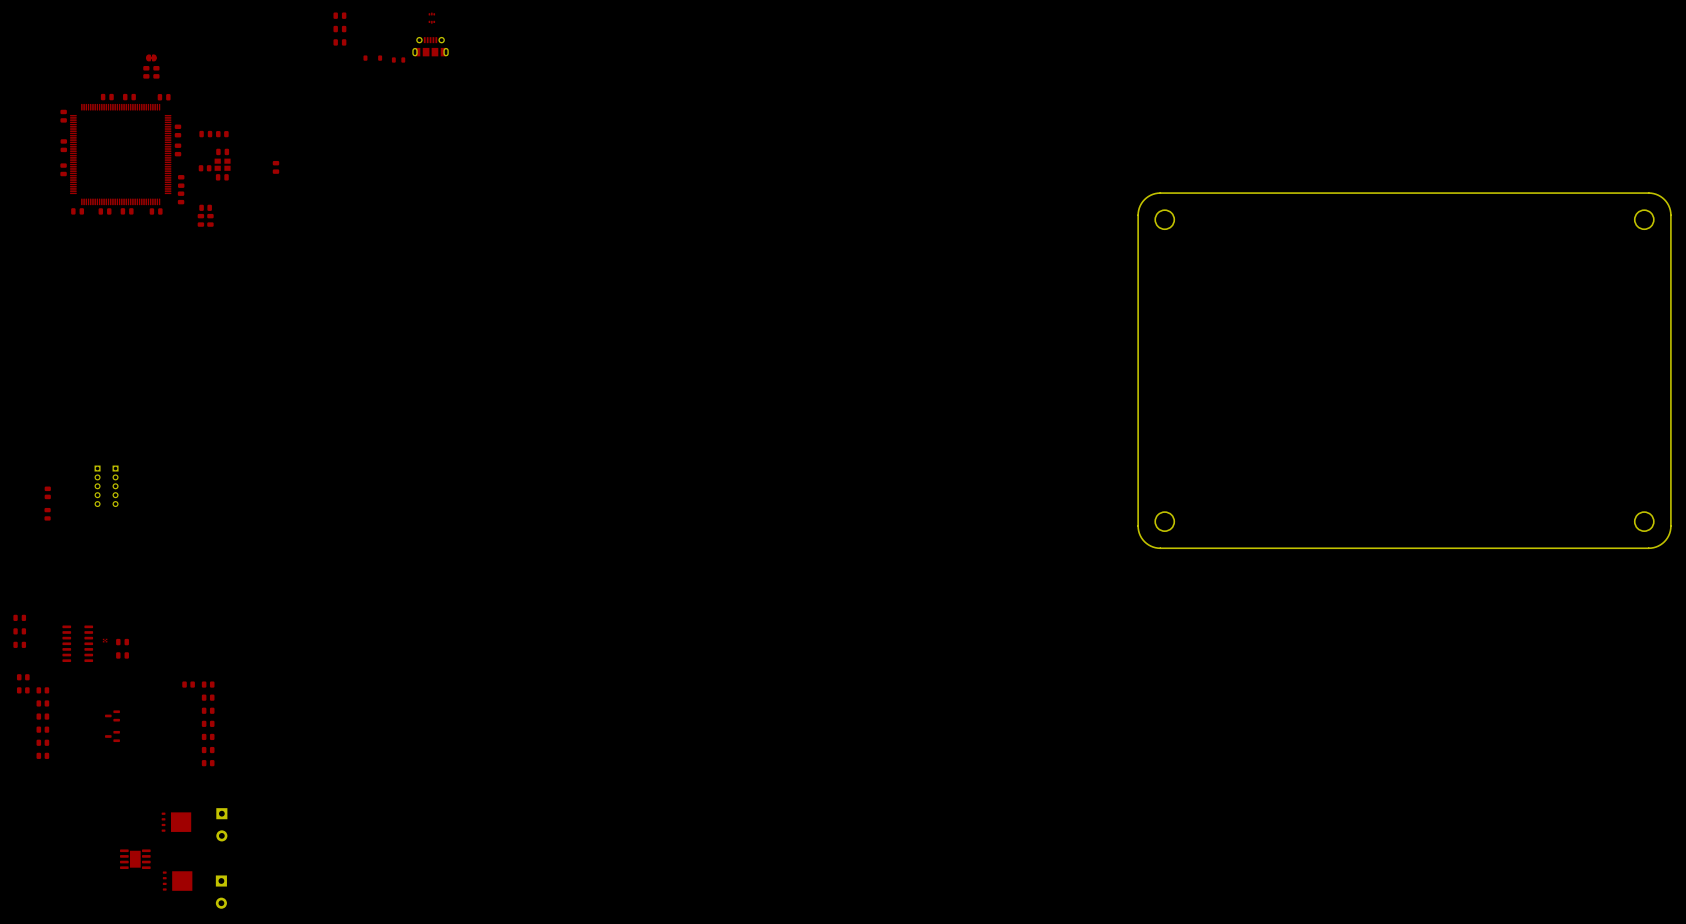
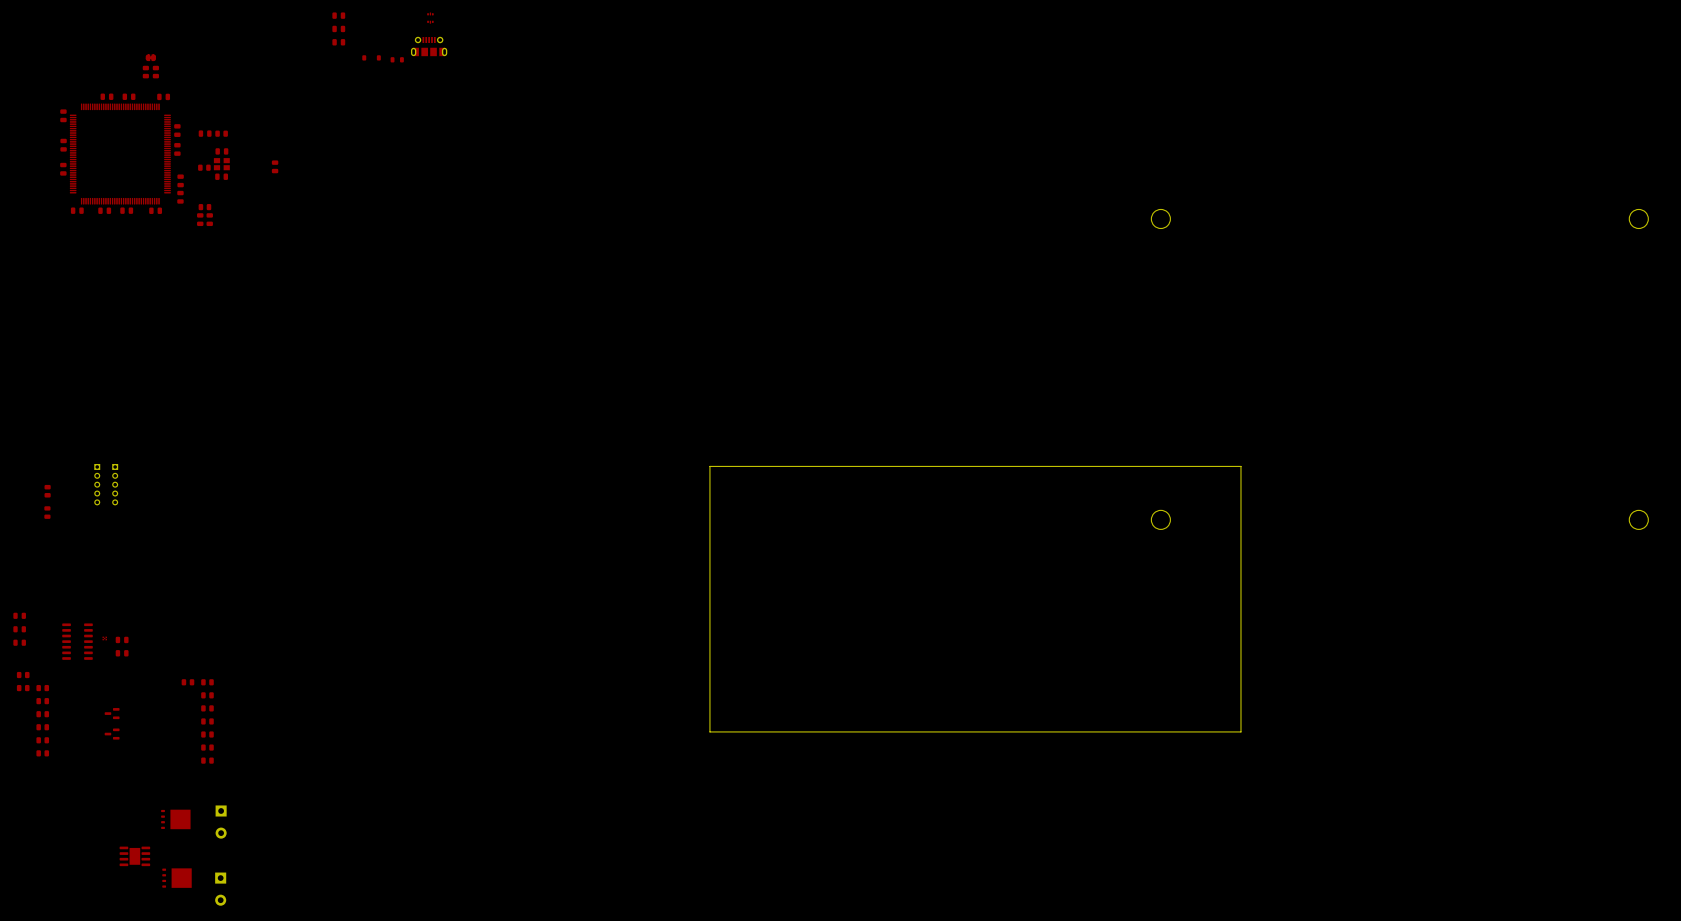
board edge: (1648, 193) (1160, 193) (1148, 196) (1141, 203) (1138, 215) (1138, 526) (1141, 537) (1148, 544) (1160, 548) (1648, 548) (1660, 544) (1667, 537) (1670, 526) (1670, 215) (1668, 205) (1664, 199) (1656, 194) (1648, 193) -> none
board edge: none -> (1240, 466) (709, 466) (709, 731) (1240, 731) (1240, 466)

